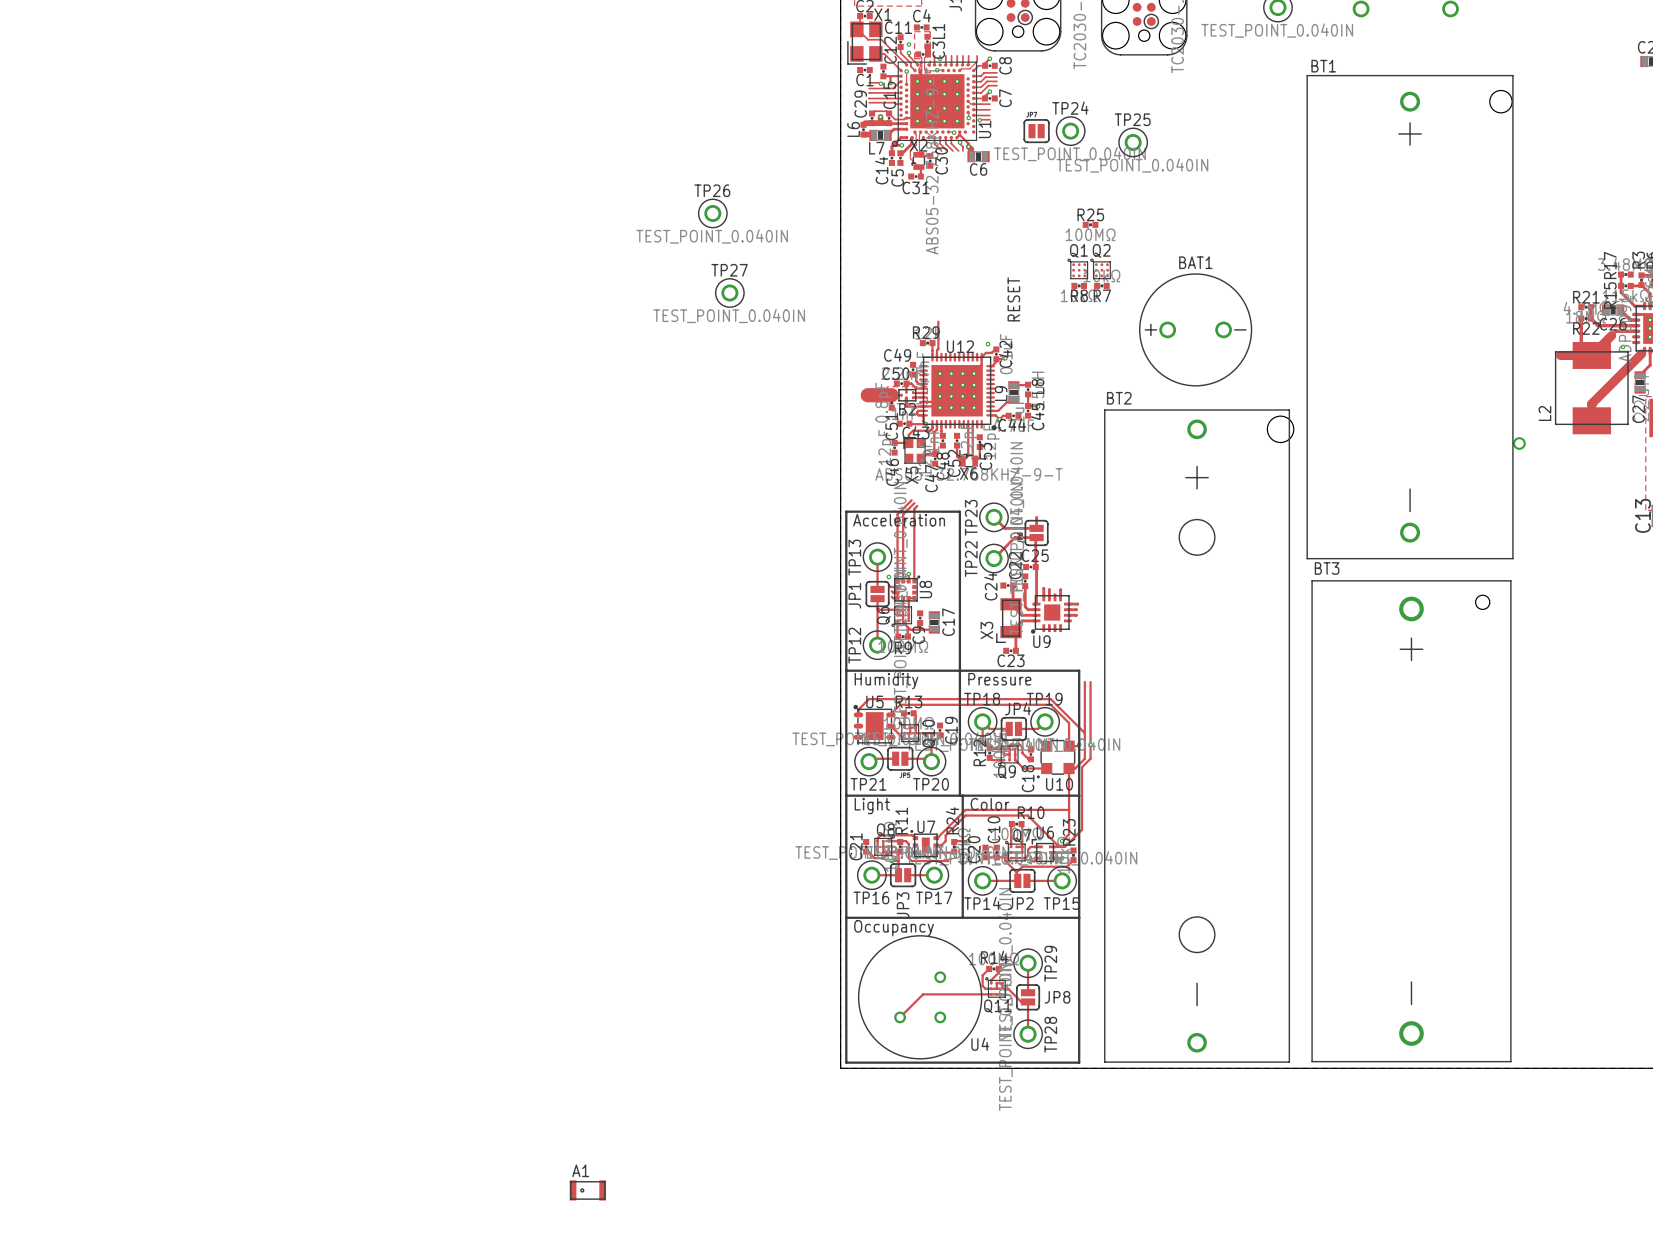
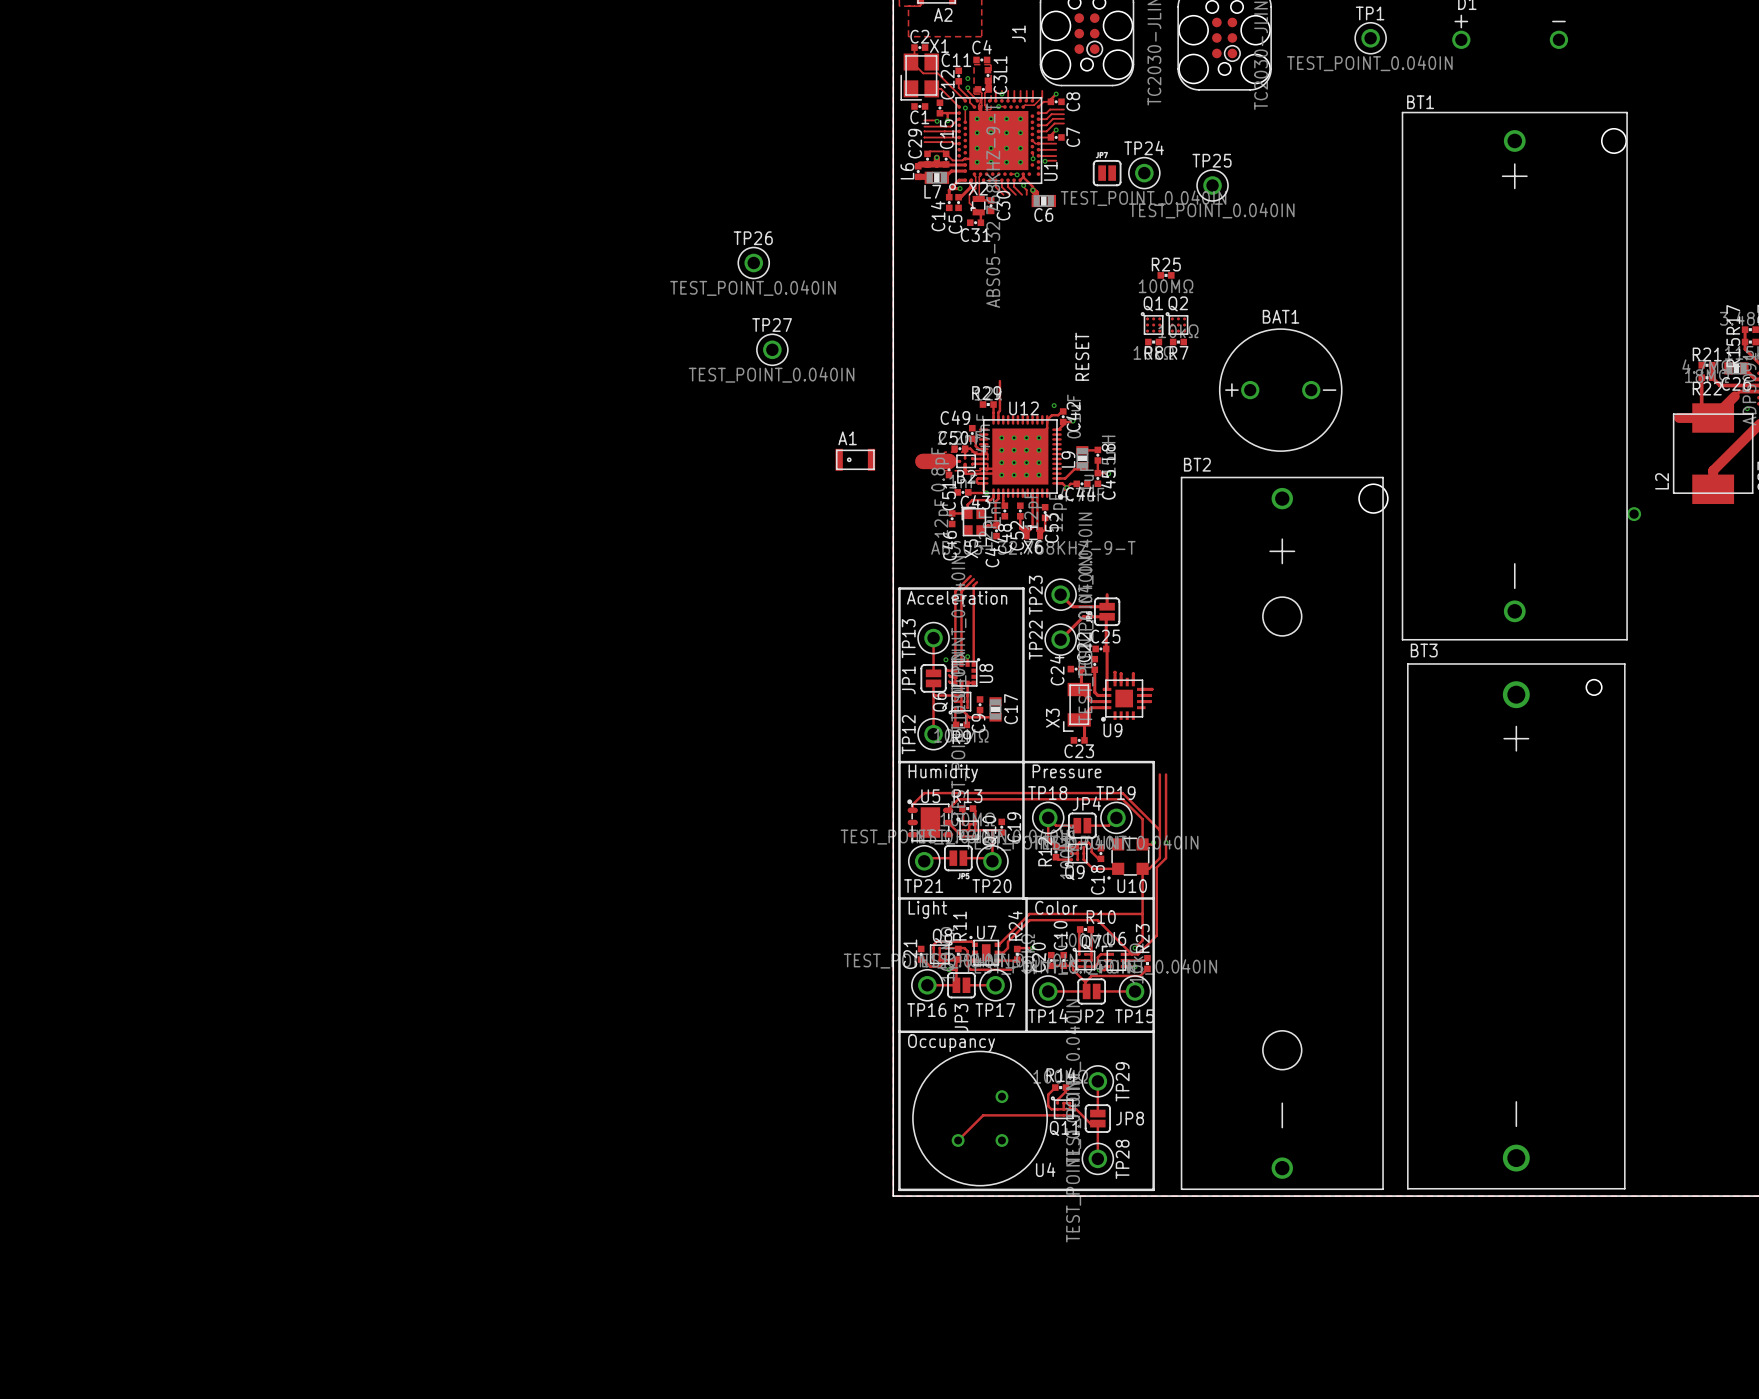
A1 position: (587, 1190) -> (855, 459)

